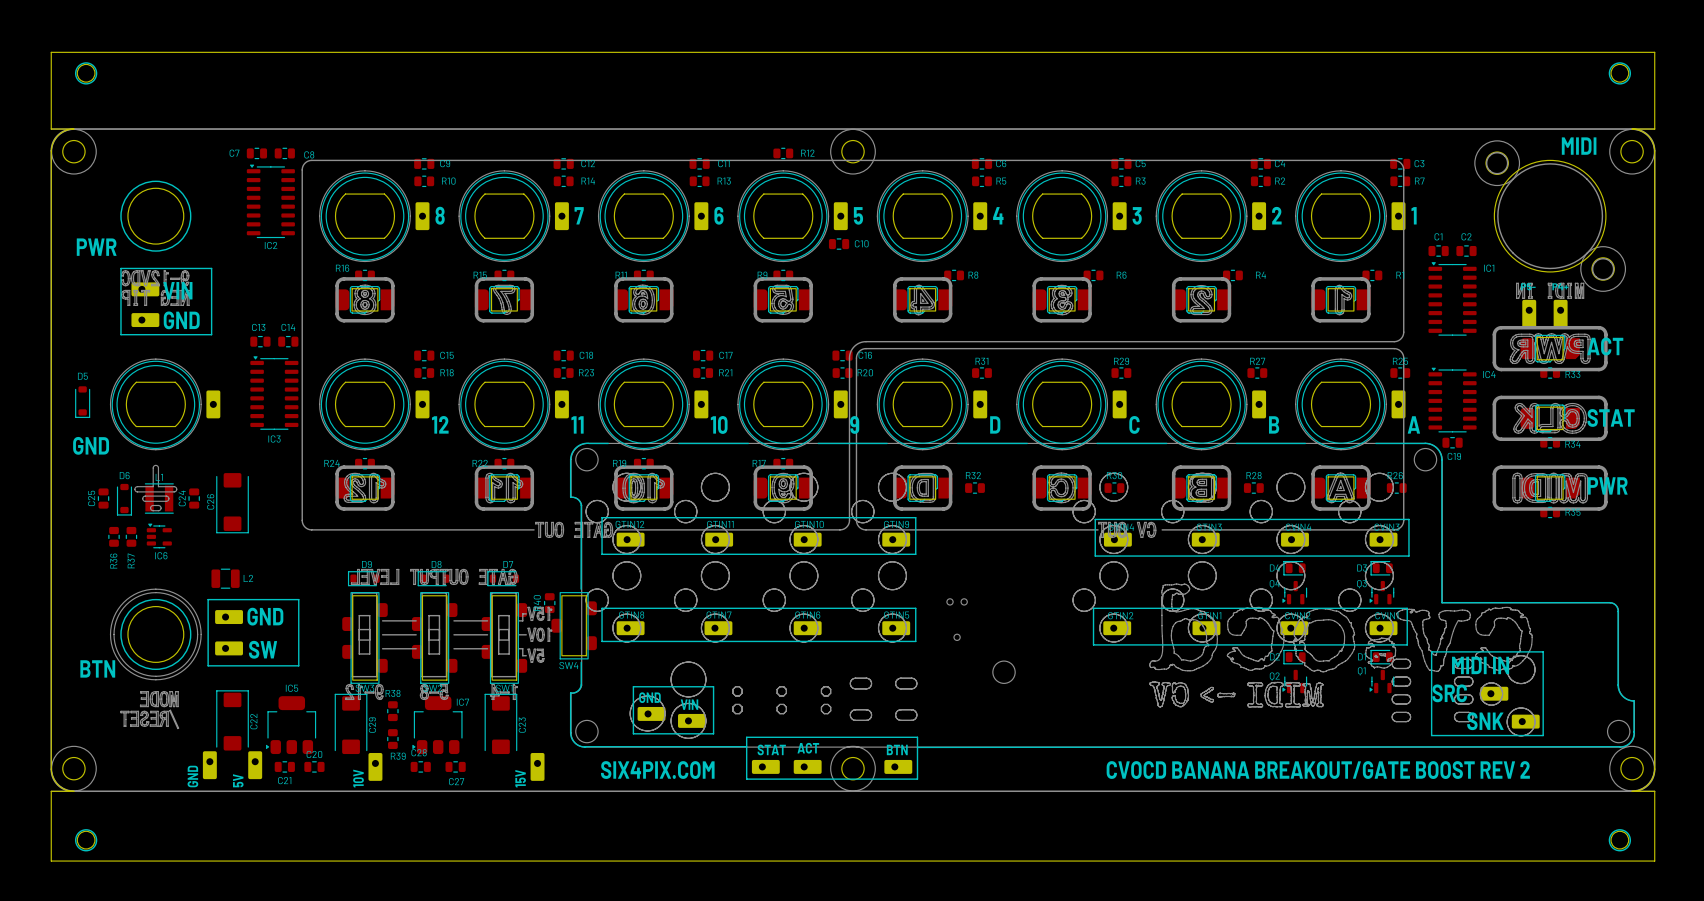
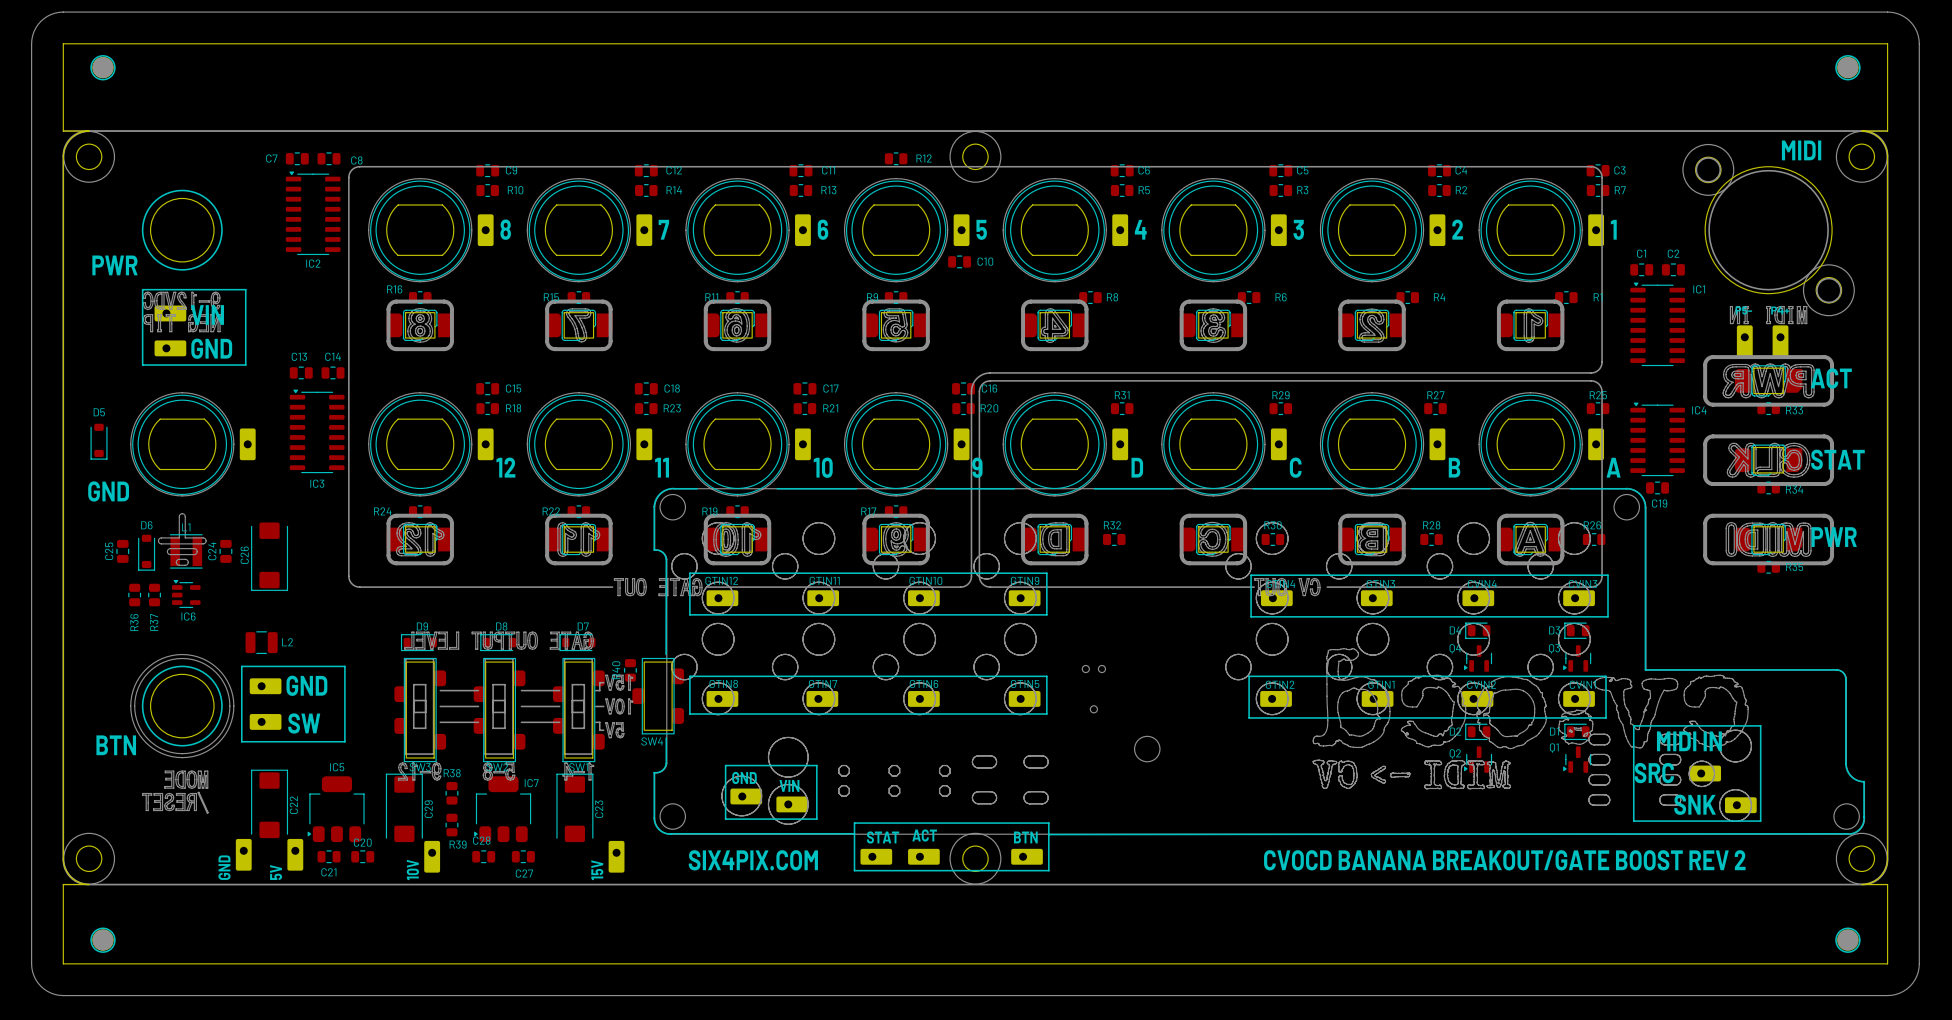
line: none -> (63, 12) (1887, 12) (1903, 16) (1915, 27) (1919, 43) (1919, 963) (1915, 979) (1903, 991) (1887, 995) (63, 995) (47, 991) (35, 979) (31, 963) (31, 43) (34, 31) (40, 21) (51, 14) (63, 12)
drawing: none -> [92, 57, 114, 79]
drawing: none -> [1837, 57, 1859, 79]
drawing: none -> [92, 929, 114, 951]
drawing: none -> [1837, 929, 1859, 951]

